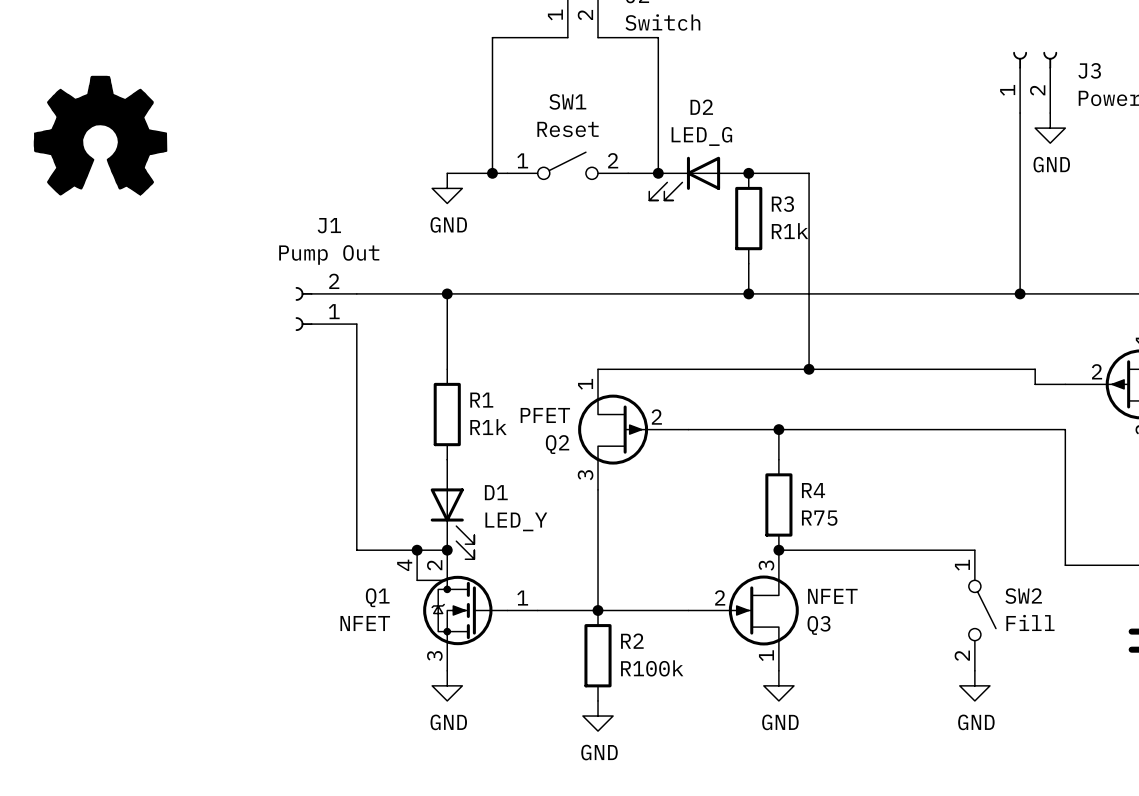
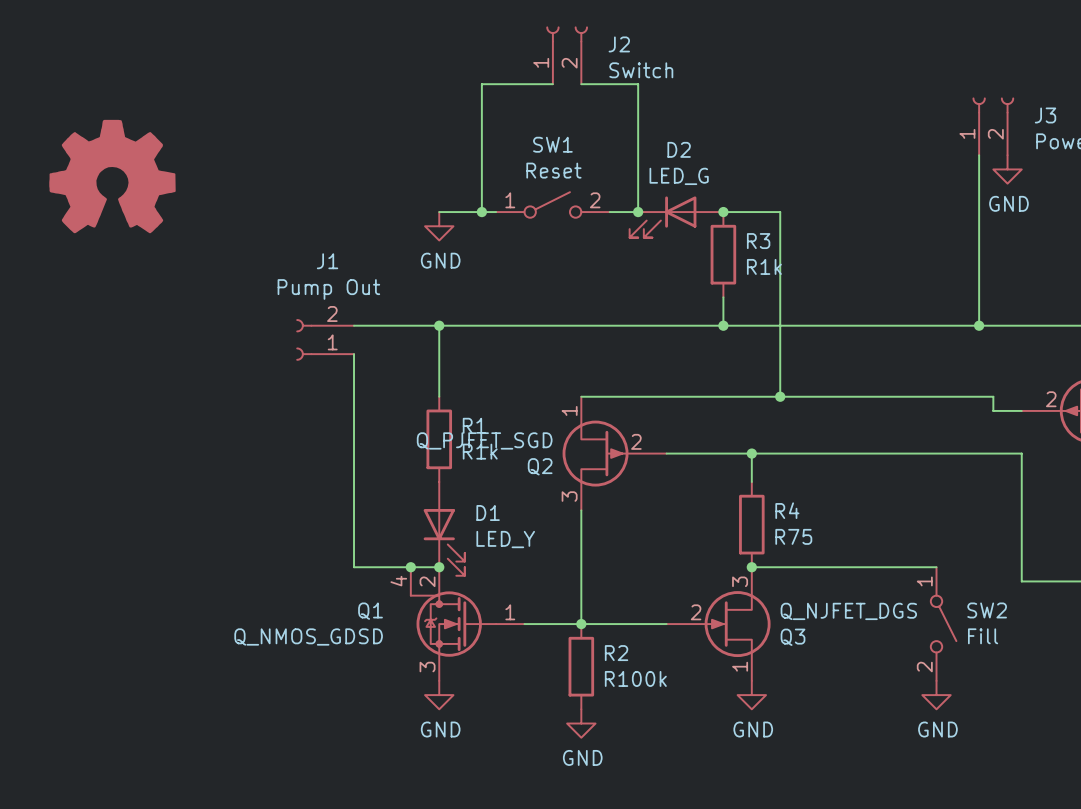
Q2 value: PFET (545, 415) -> Q_PJFET_SGD (484, 440)
Q3 value: NFET (832, 596) -> Q_NJFET_DGS (848, 611)
Q1 value: NFET (365, 623) -> Q_NMOS_GDSD (308, 637)

